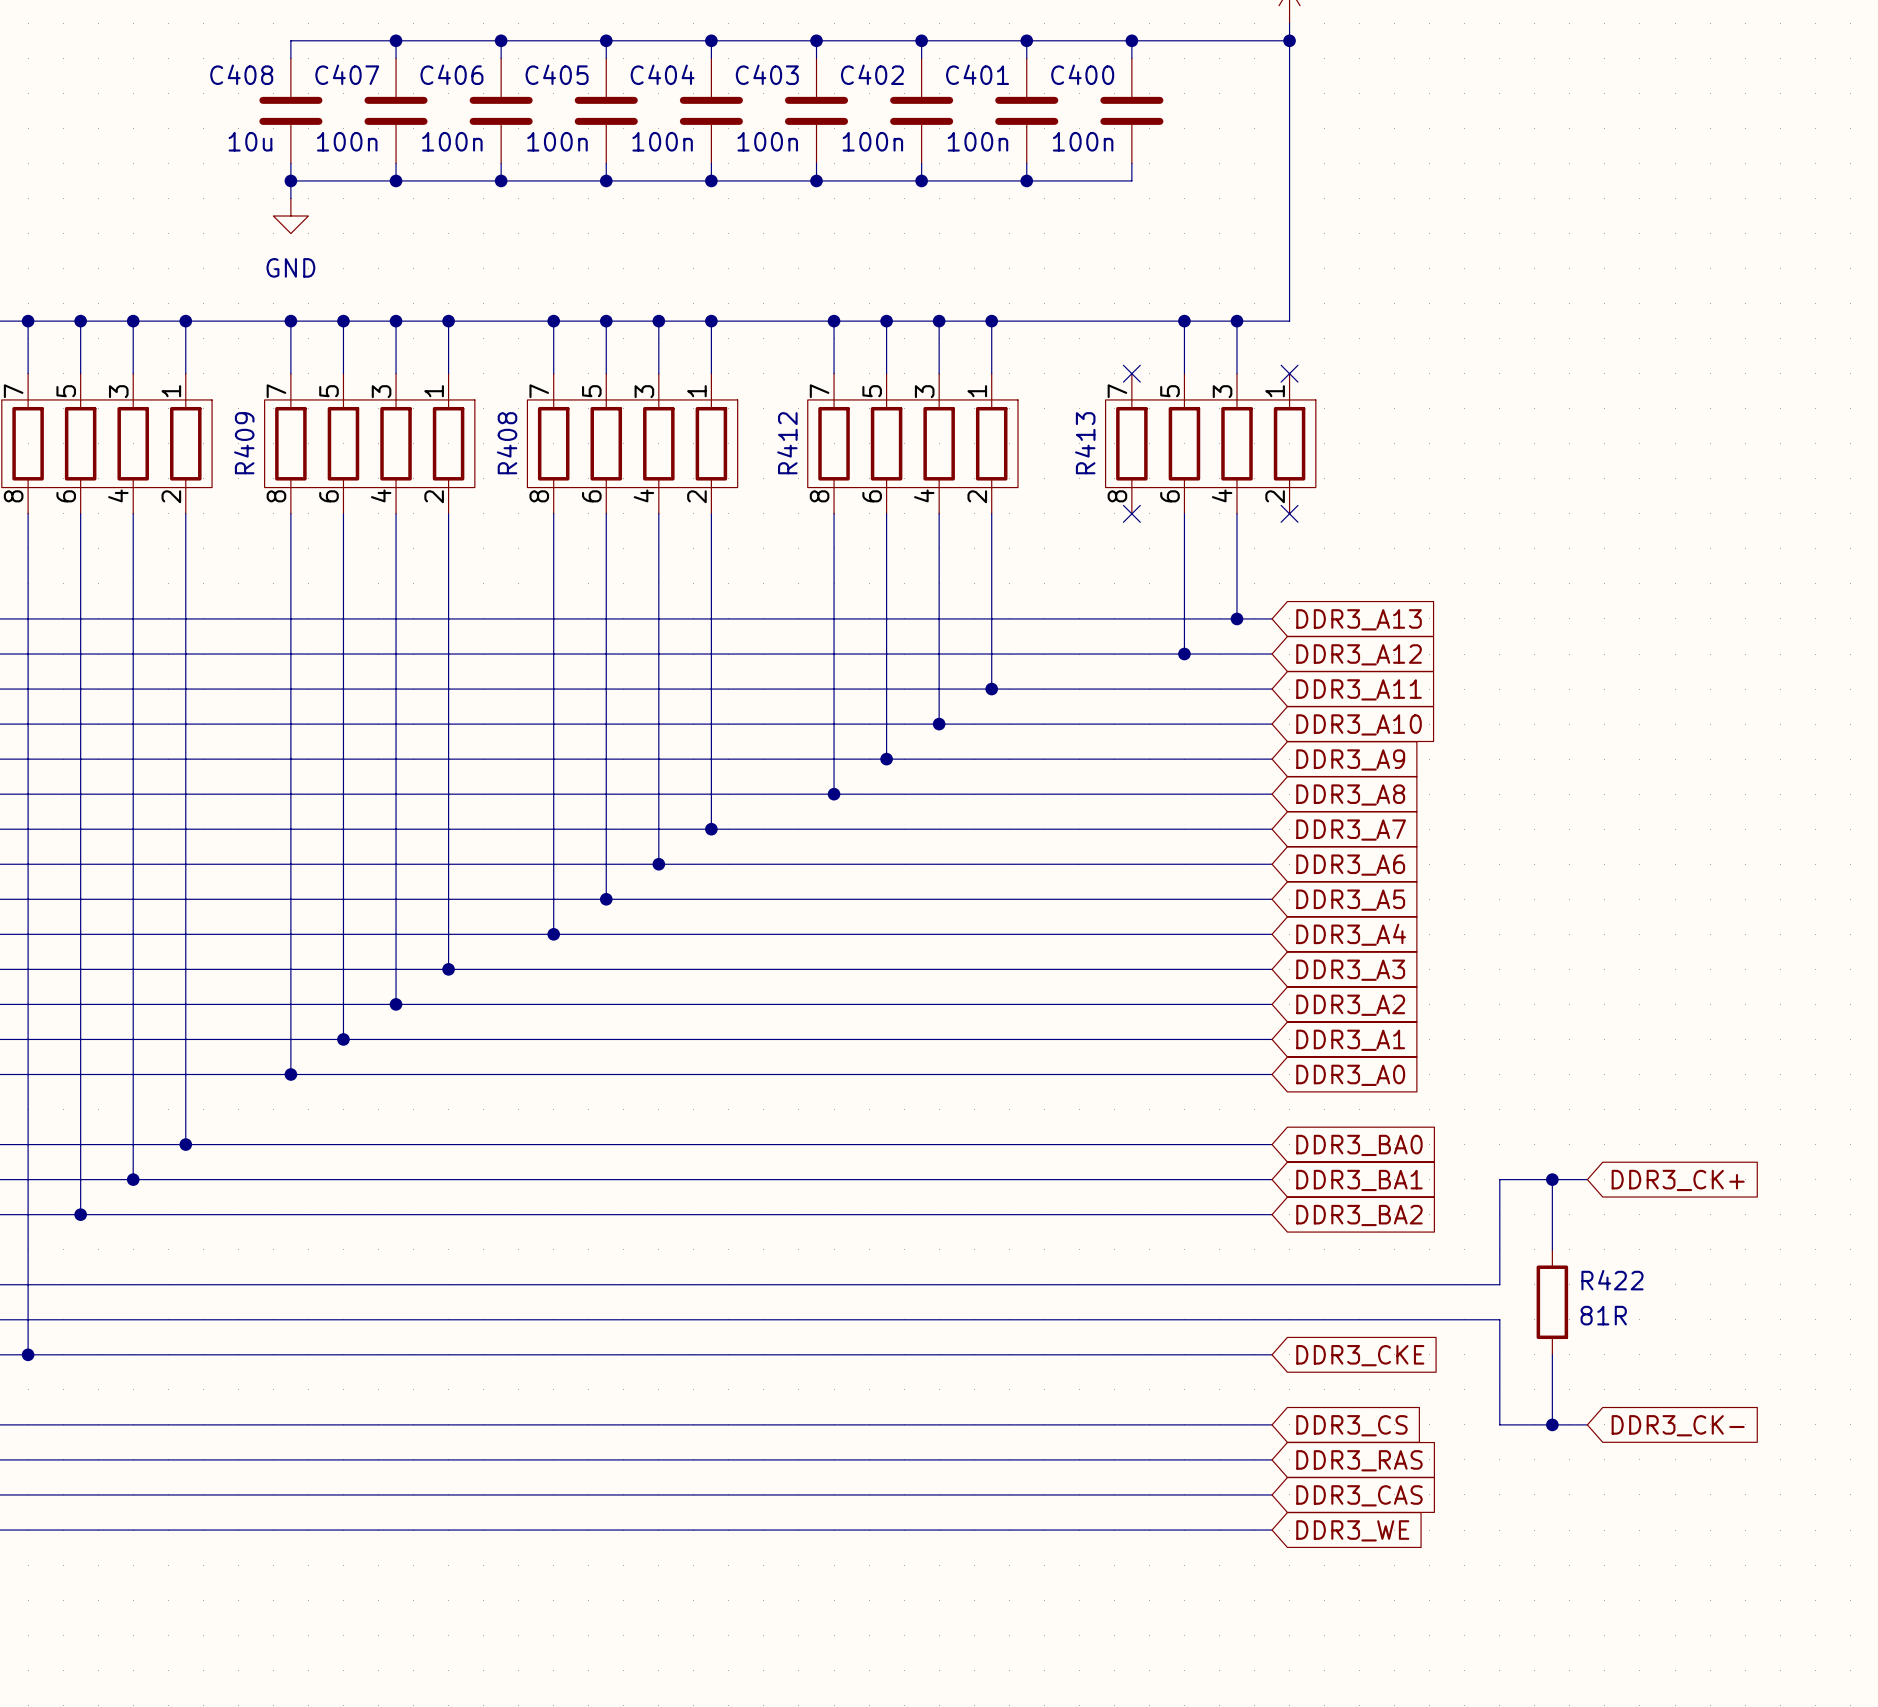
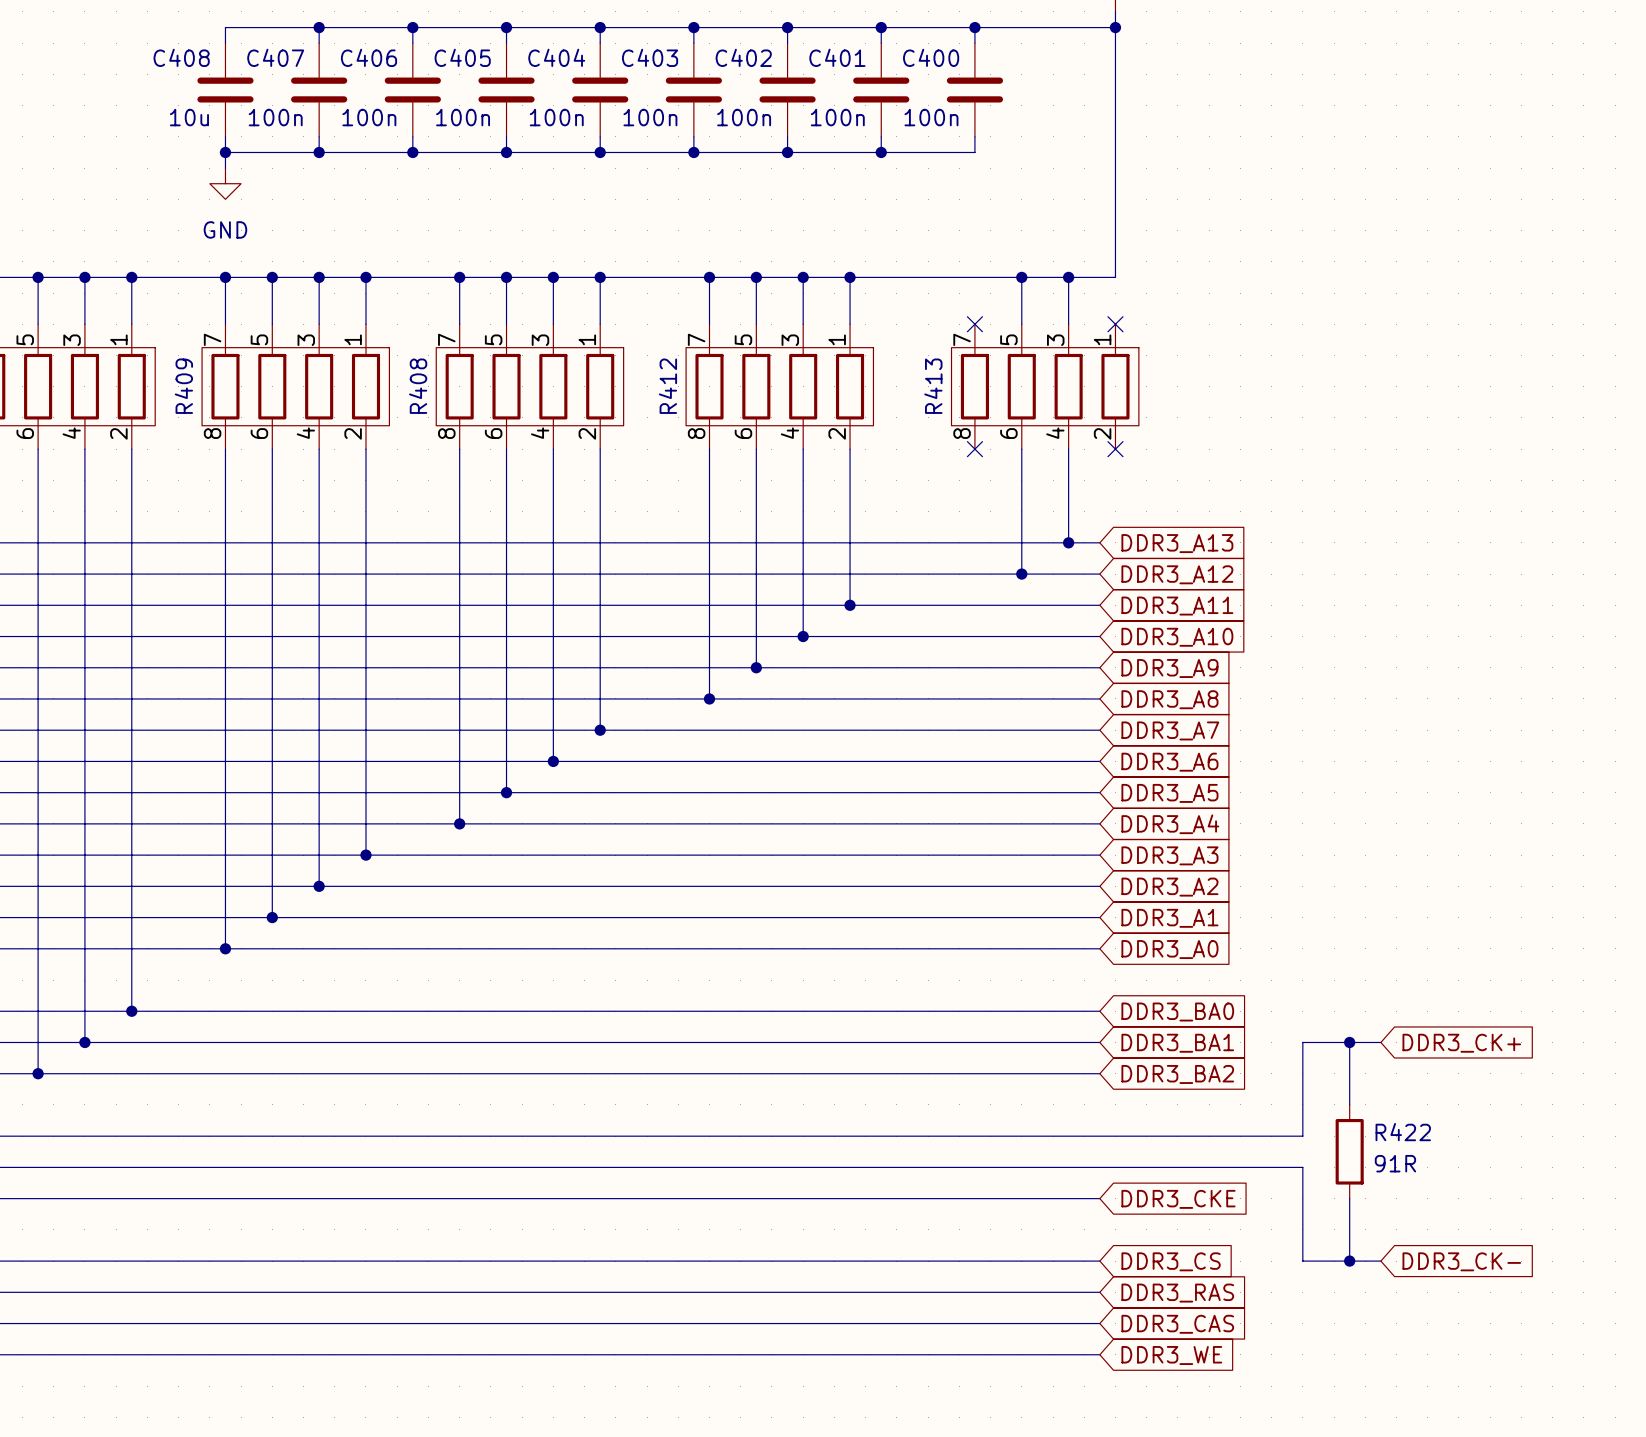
R422 value: 81R (1603, 1315) -> 91R (1395, 1163)

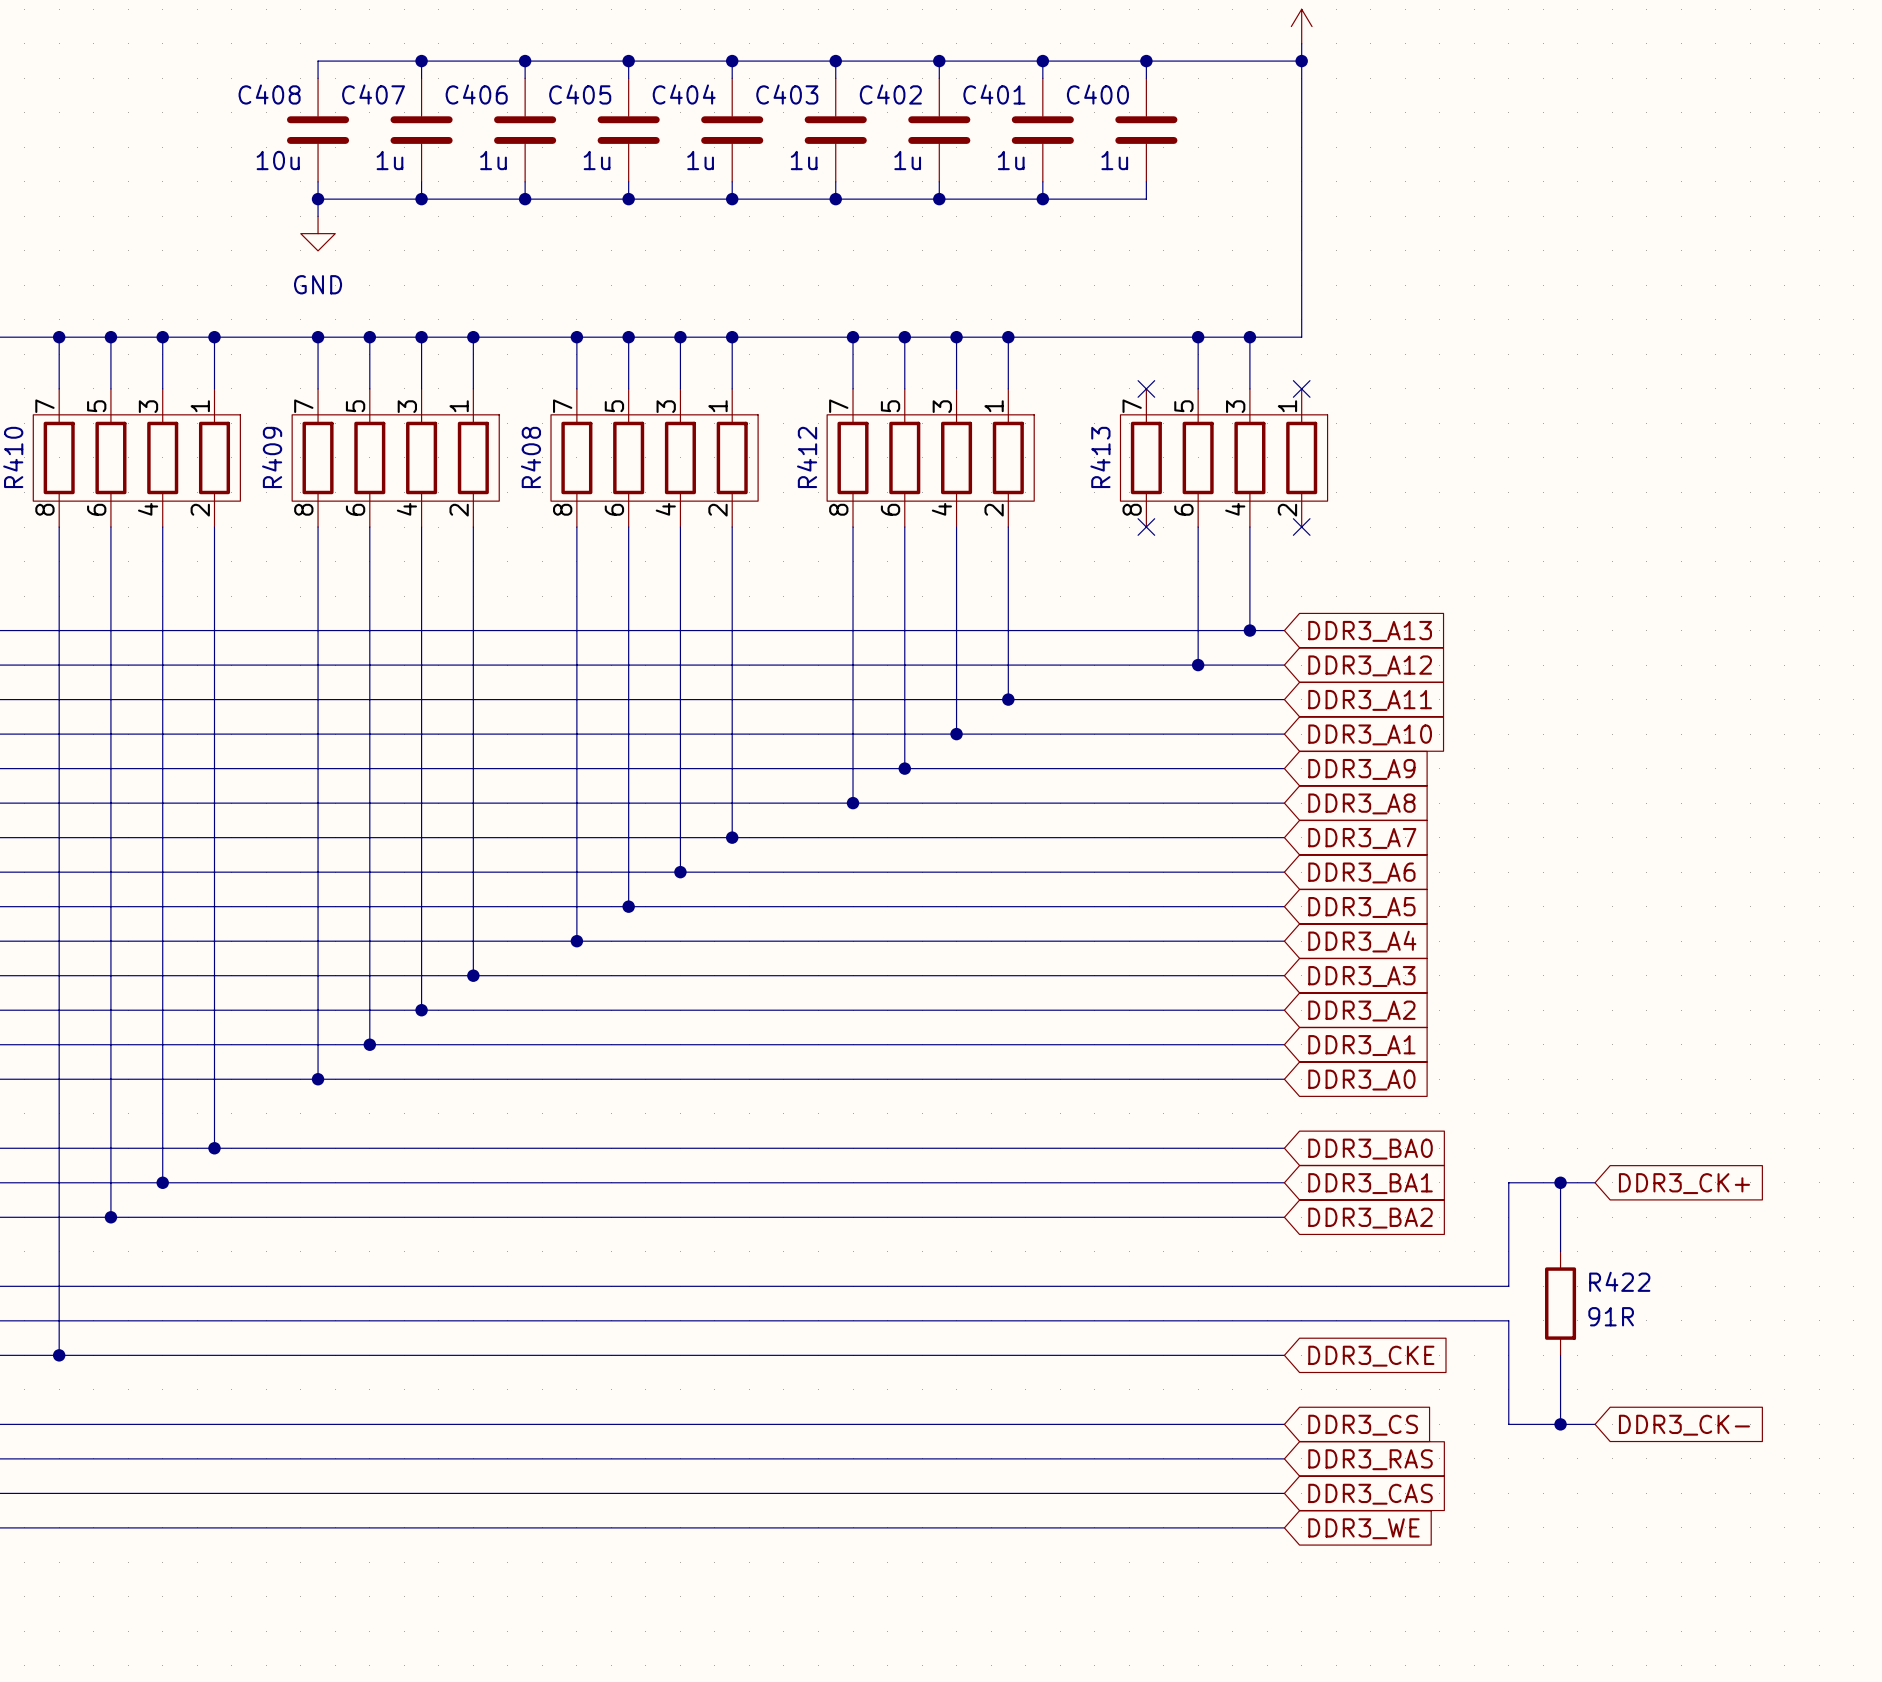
C407 value: 100n (275, 117) -> 1u (389, 160)
C406 value: 100n (369, 117) -> 1u (493, 160)
C405 value: 100n (463, 117) -> 1u (597, 160)
C404 value: 100n (556, 117) -> 1u (700, 160)
C403 value: 100n (650, 117) -> 1u (804, 160)
C402 value: 100n (744, 117) -> 1u (907, 160)
C401 value: 100n (837, 117) -> 1u (1011, 160)
C400 value: 100n (931, 117) -> 1u (1114, 160)

